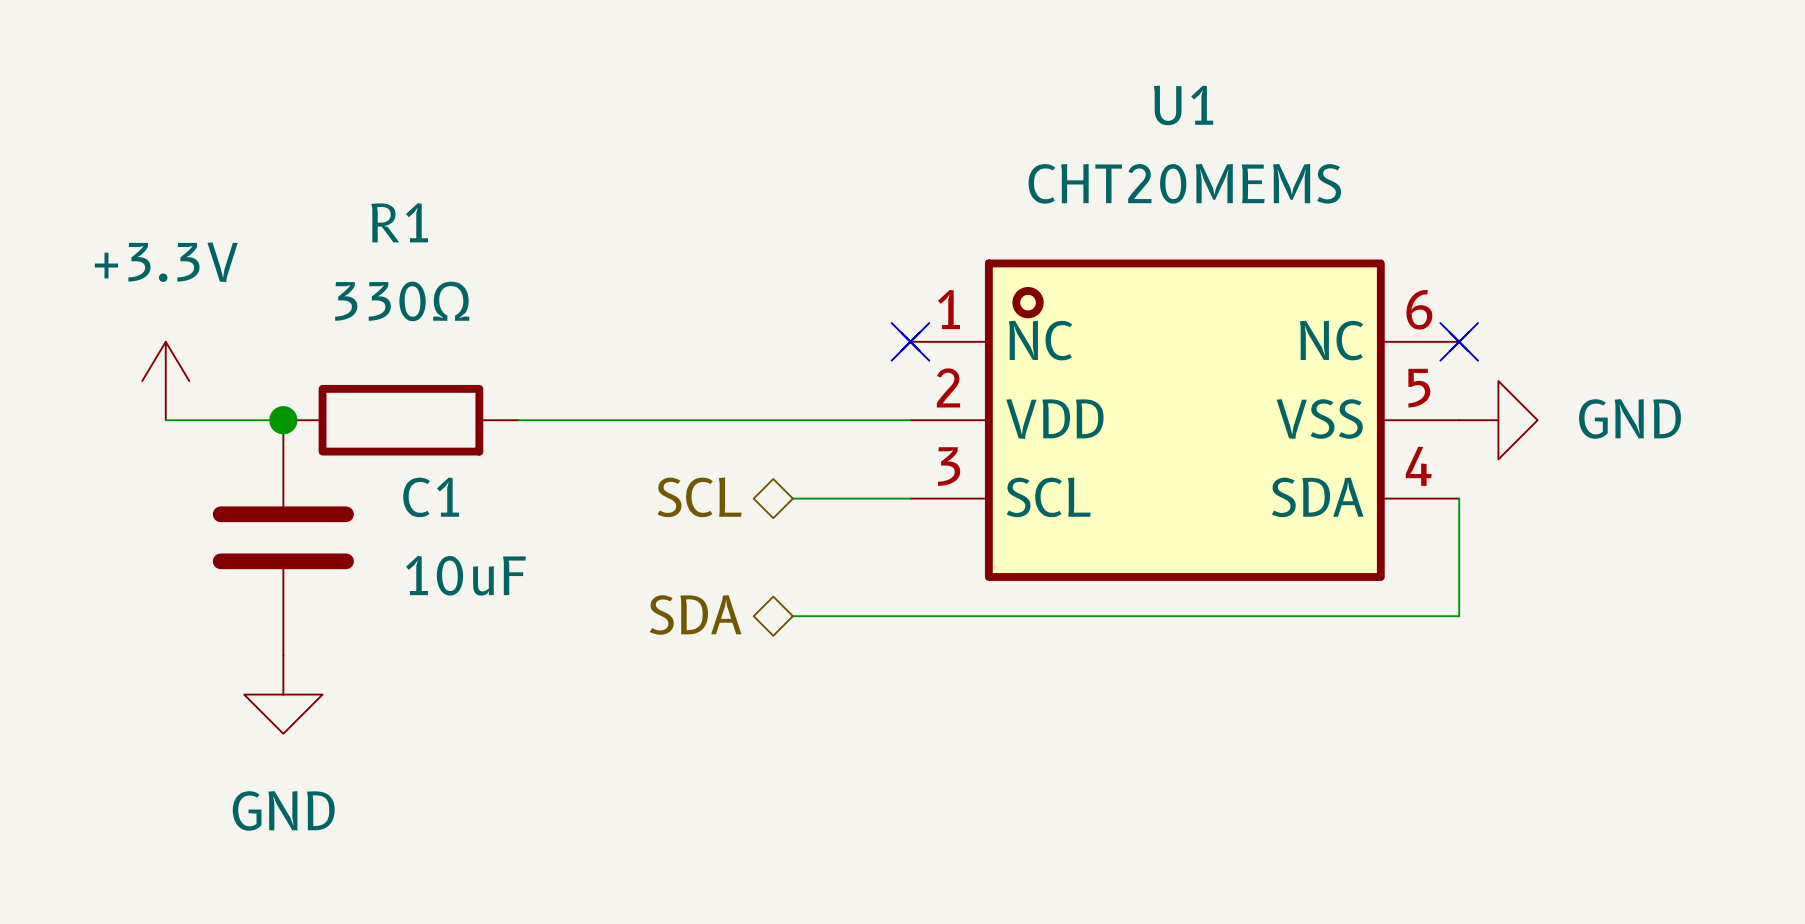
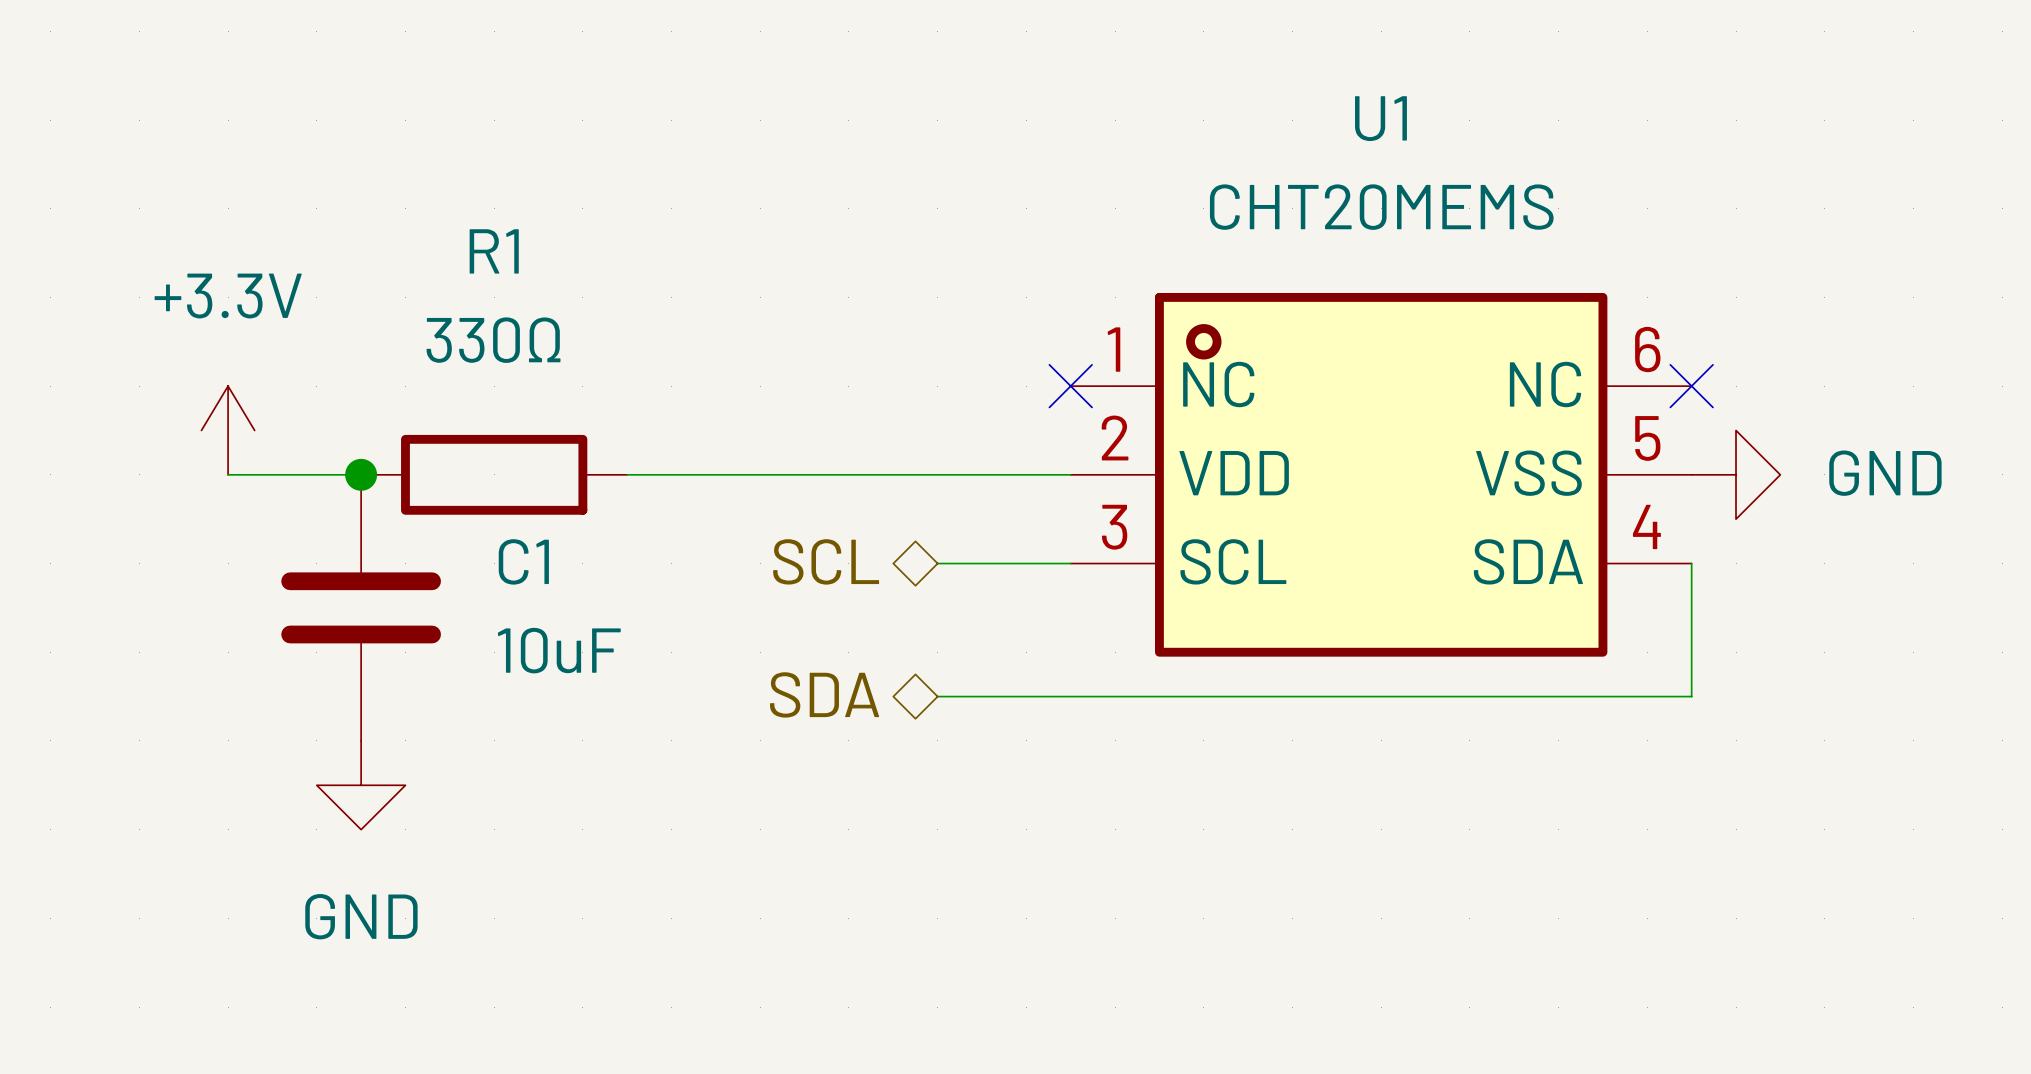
U1 symbol: [901, 259, 1469, 581] -> [1070, 292, 1692, 657]

